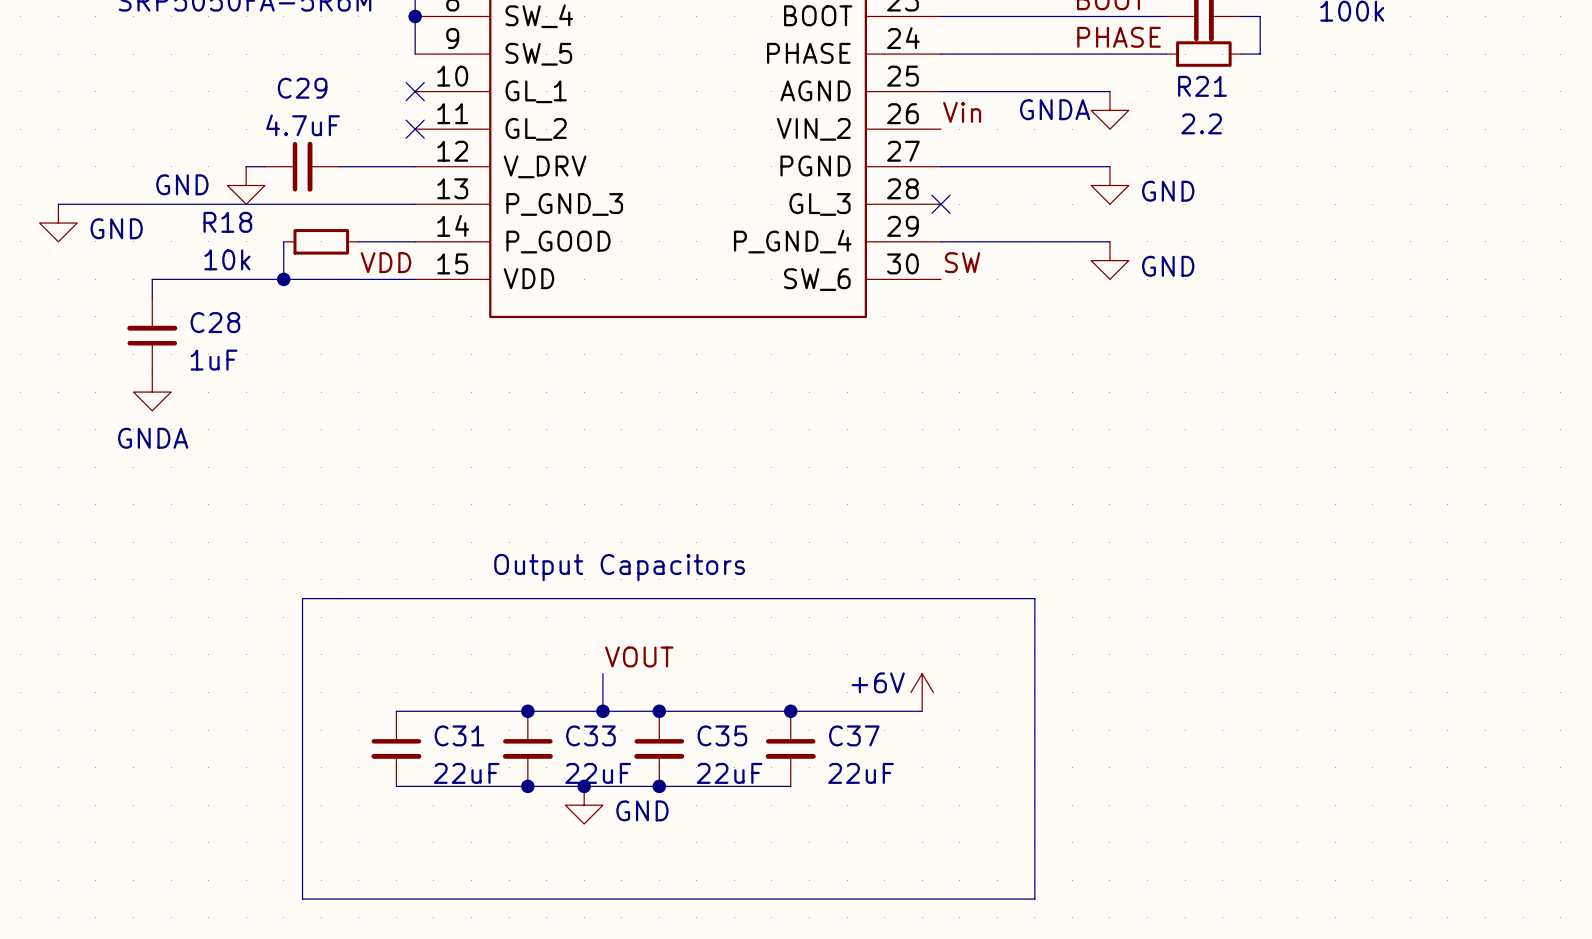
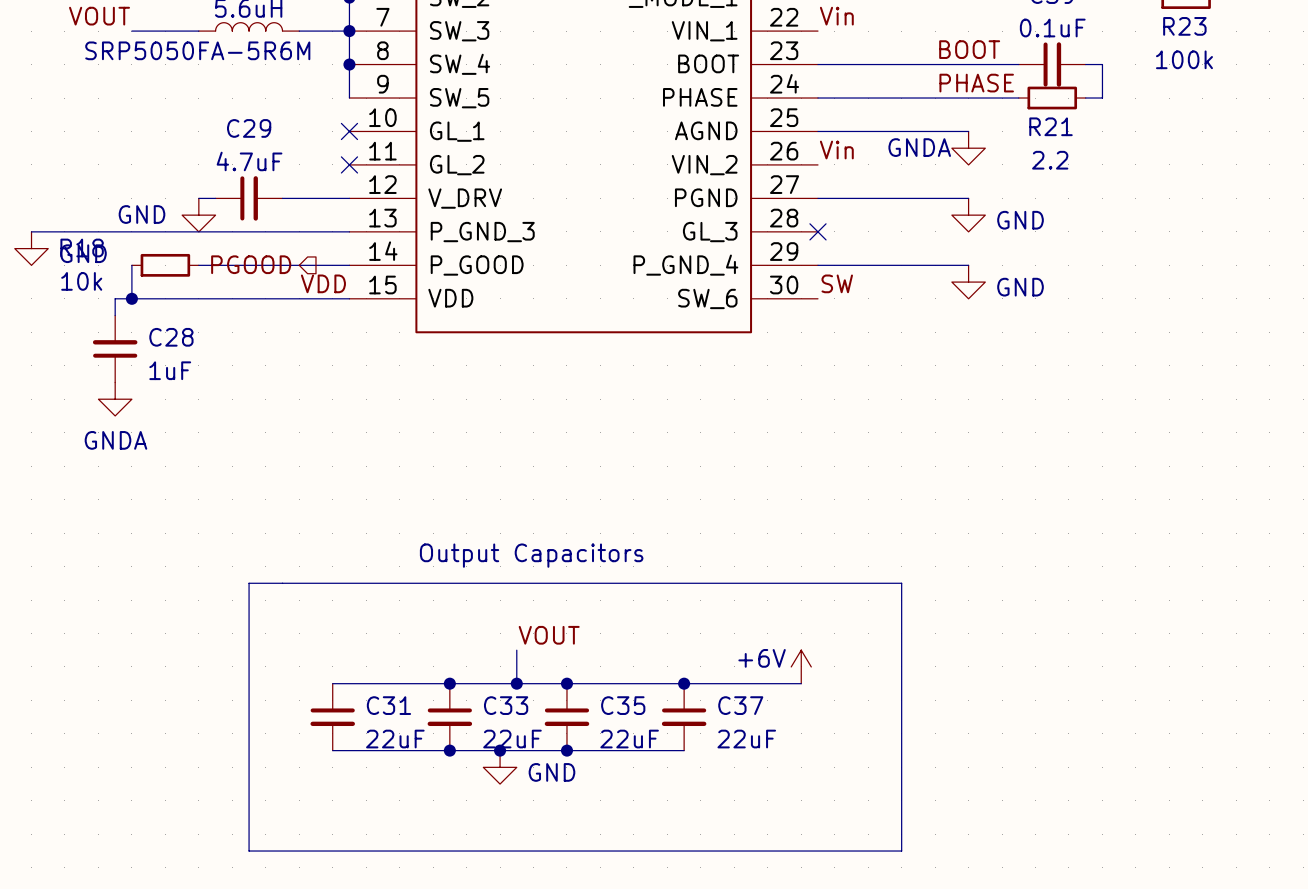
wire: none -> (198, 265) (299, 265)
wire: (283, 241) (283, 279) -> (131, 265) (131, 298)
hierarchical label: none -> PGOOD (251, 264)
R18 position: (321, 241) -> (165, 265)
junction: none -> (131, 298)
junction: (283, 279) -> none

